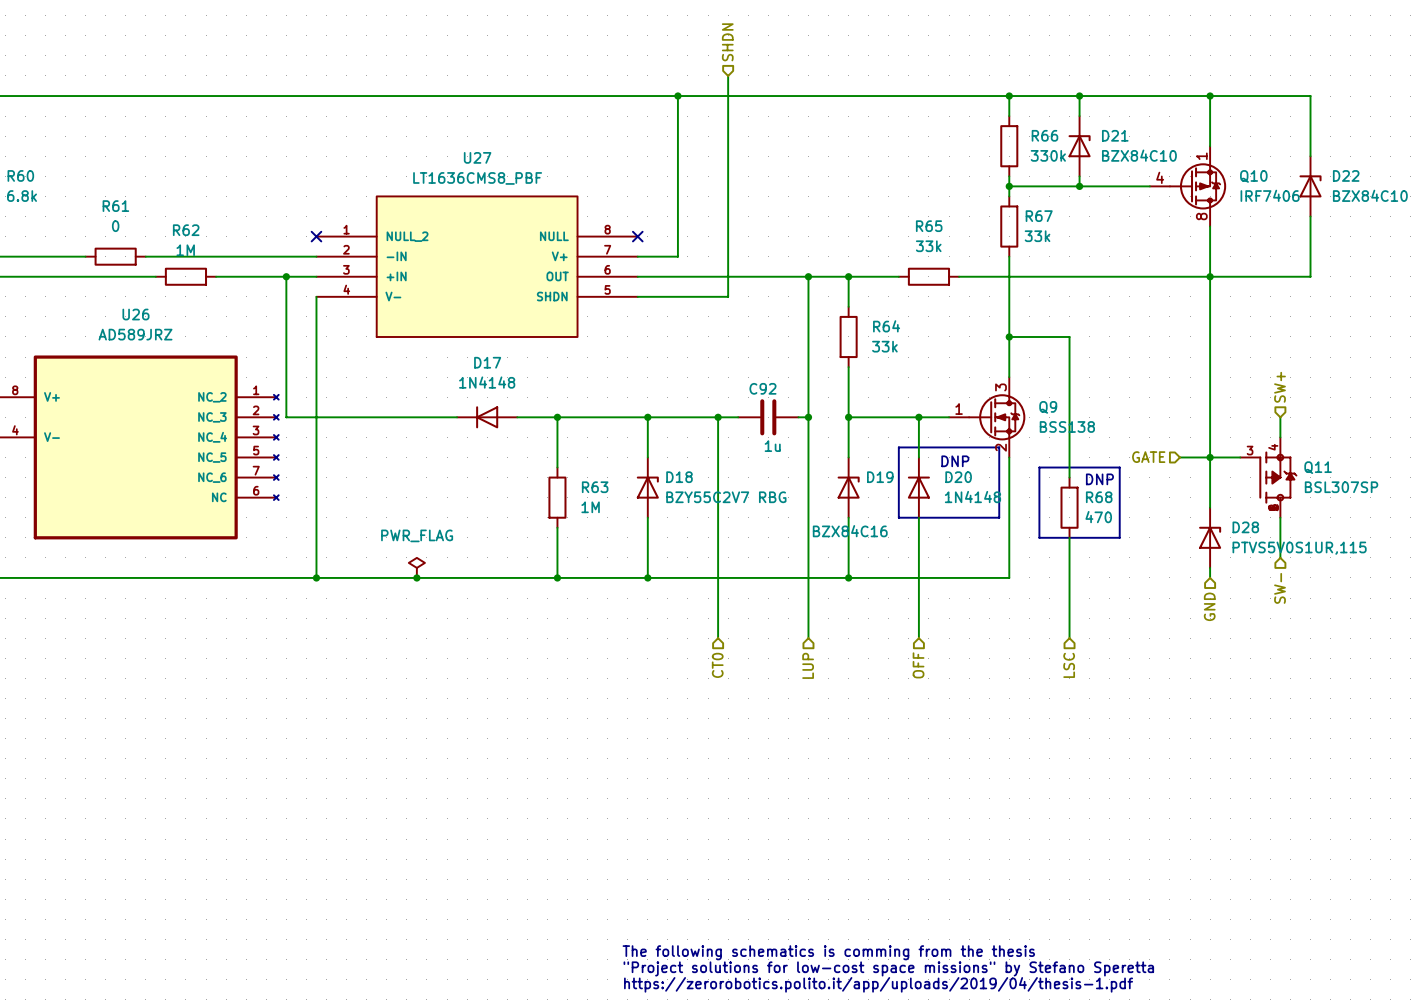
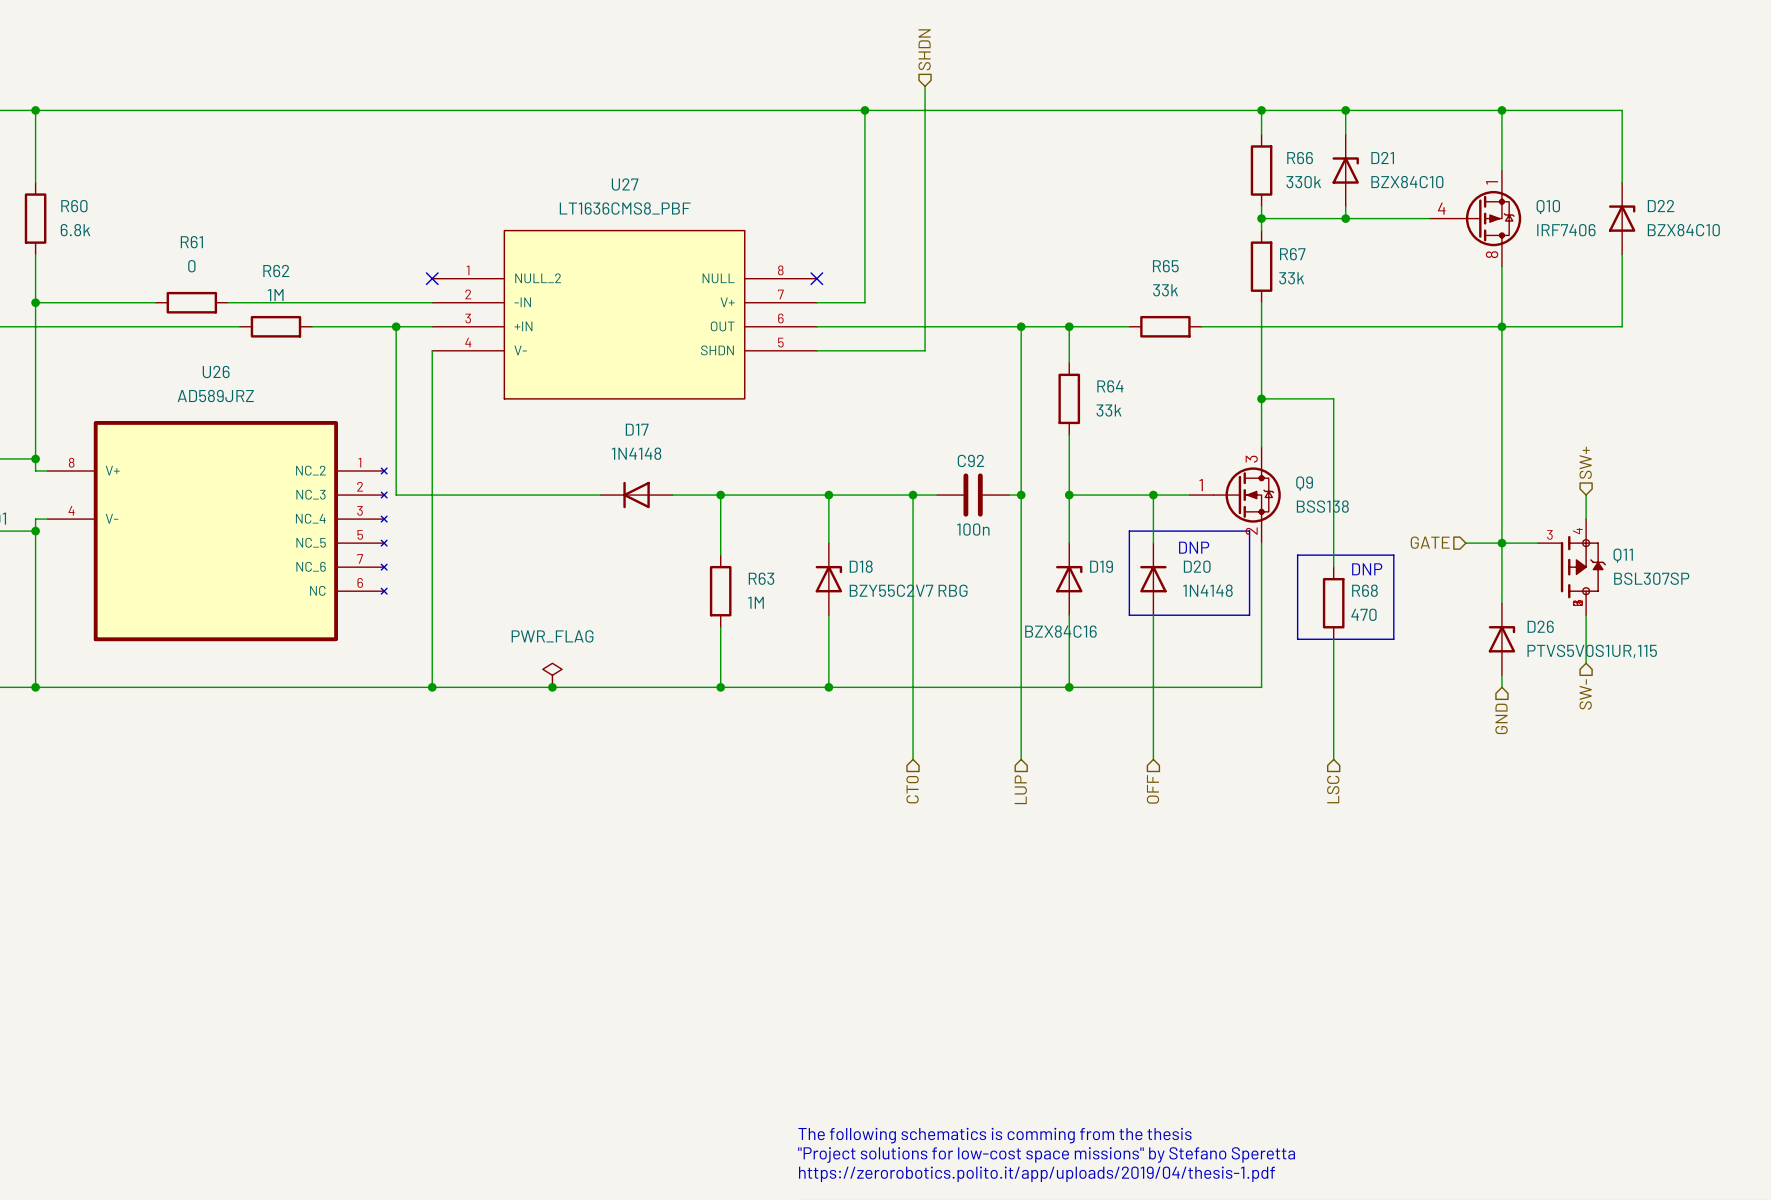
C92 value: 1u (772, 446) -> 100n (973, 529)
D28 name: D28 (1245, 527) -> D26 (1540, 626)

